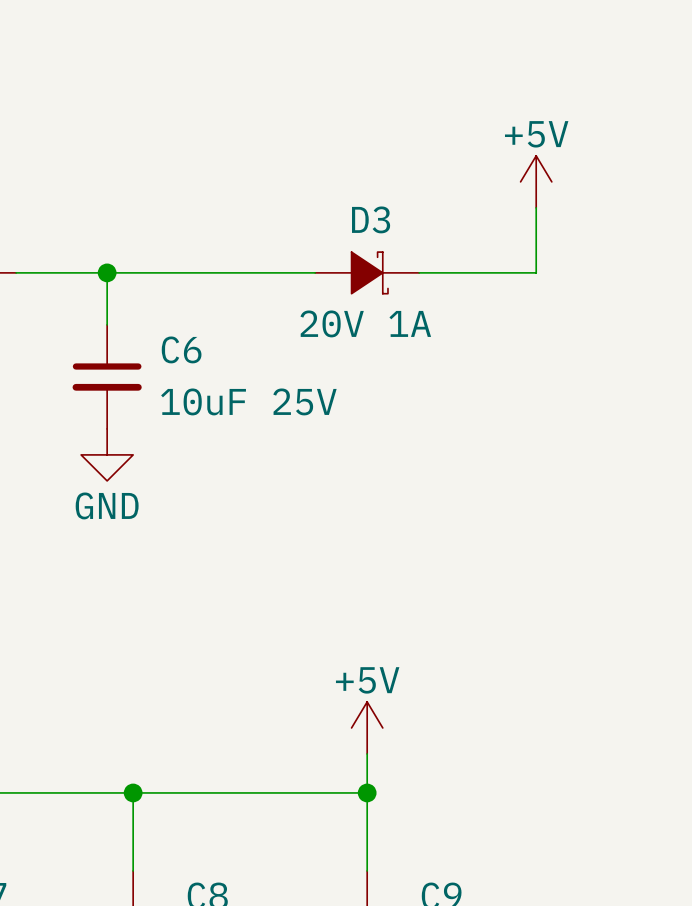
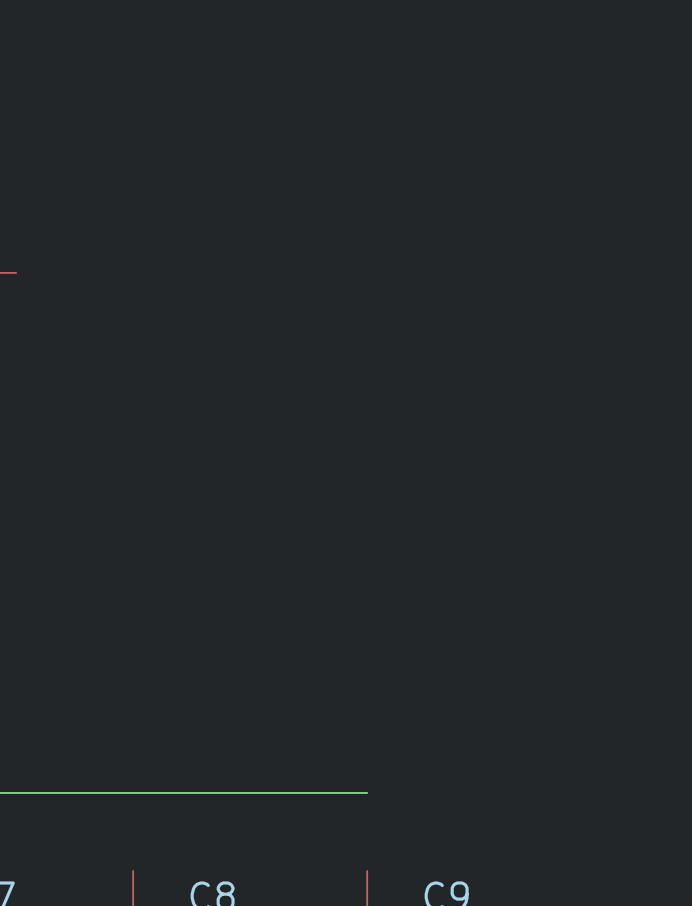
power symbol: +5V (536, 181) -> none
wire: (536, 207) (536, 272) (419, 272) -> none
wire: (16, 272) (315, 272) -> none
wire: (107, 272) (107, 324) -> none
junction: (107, 272) -> none
D3: 20V 1A (367, 272) -> none
C6: 10uF 25V (107, 376) -> none
power symbol: GND (107, 454) -> none
power symbol: +5V (367, 727) -> none
wire: (367, 753) (367, 870) -> none
wire: (133, 792) (133, 870) -> none
junction: (133, 792) -> none
junction: (367, 792) -> none

